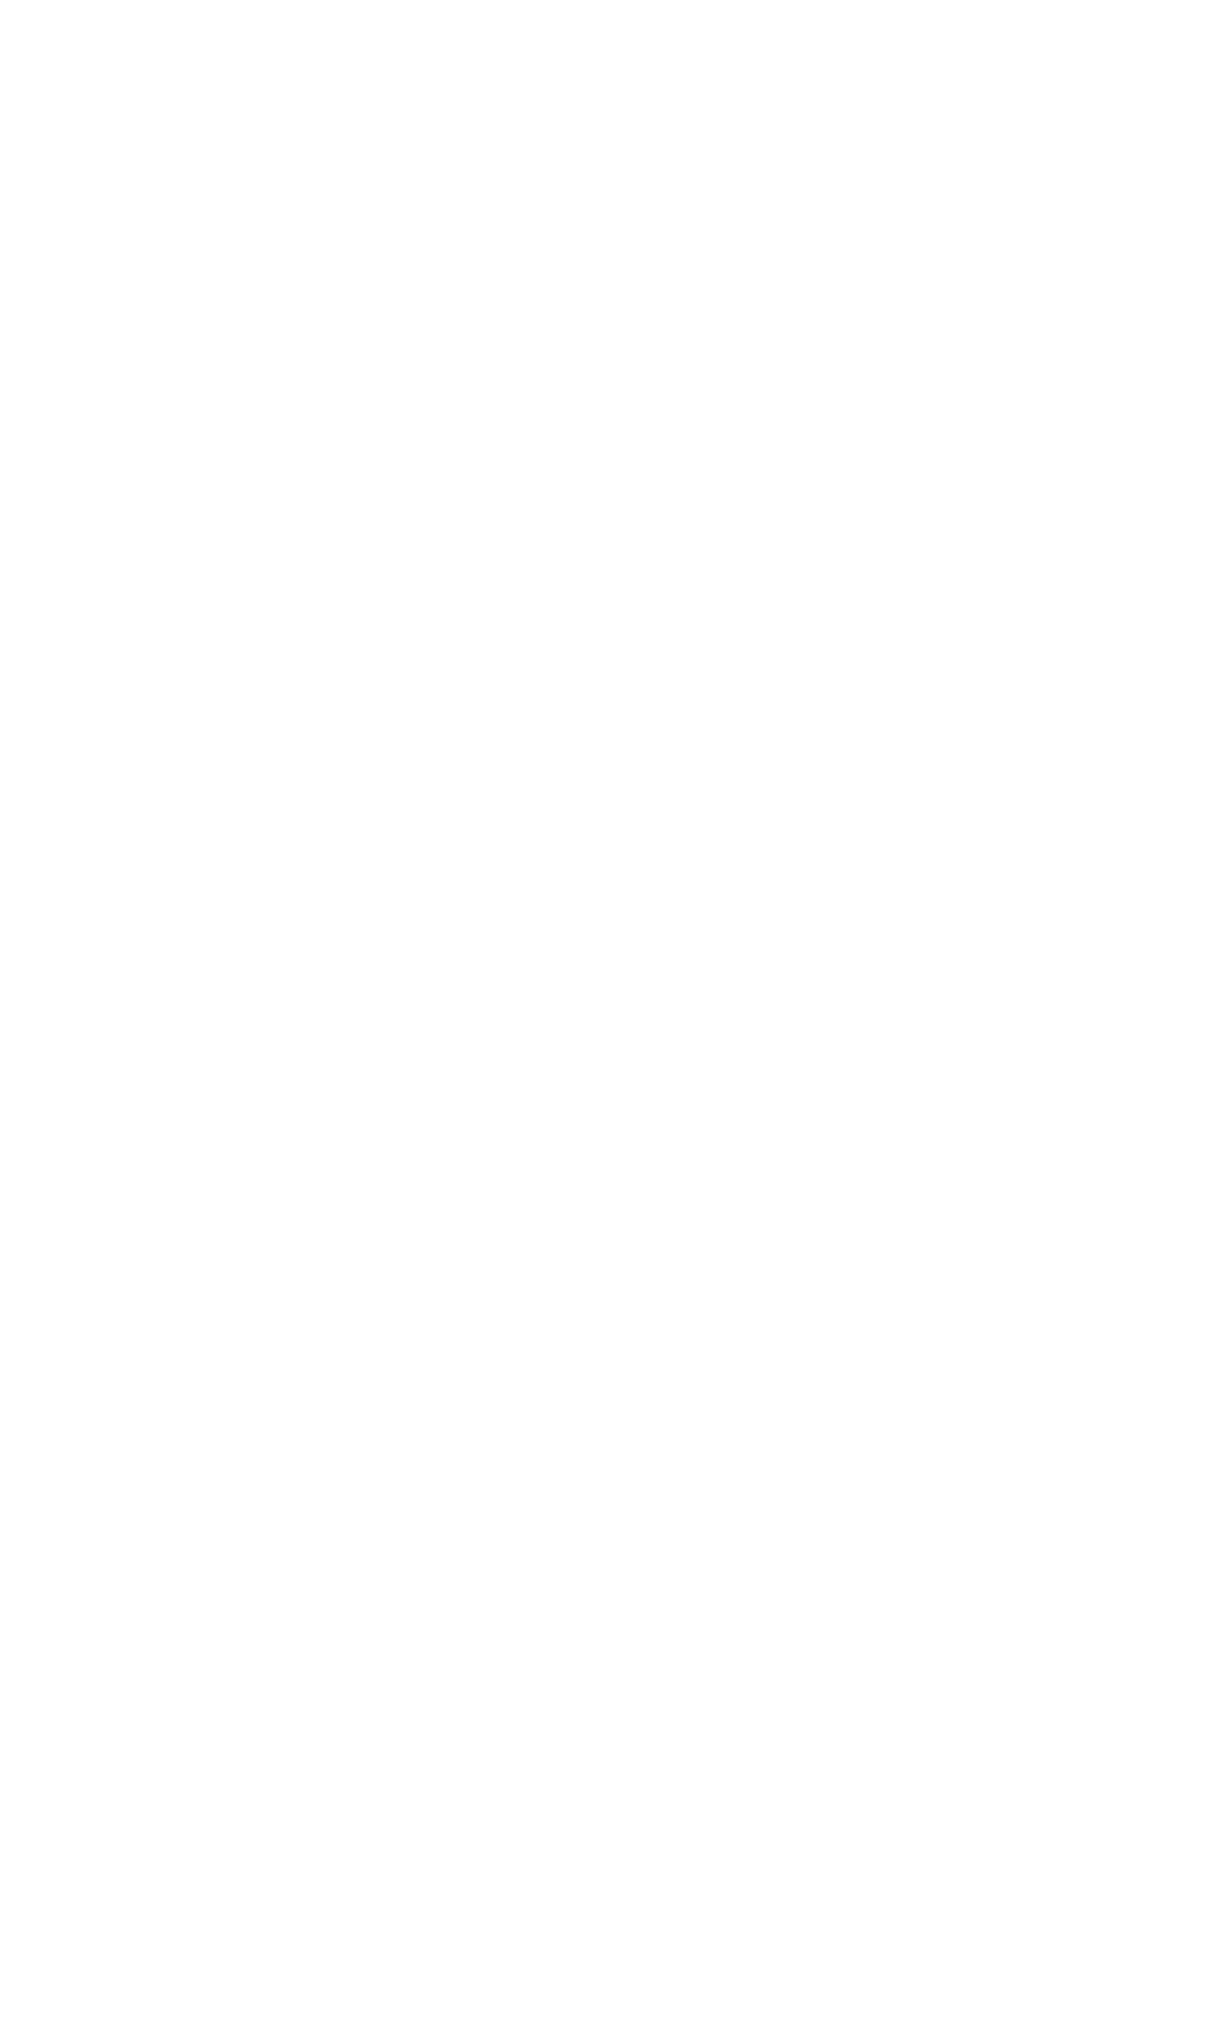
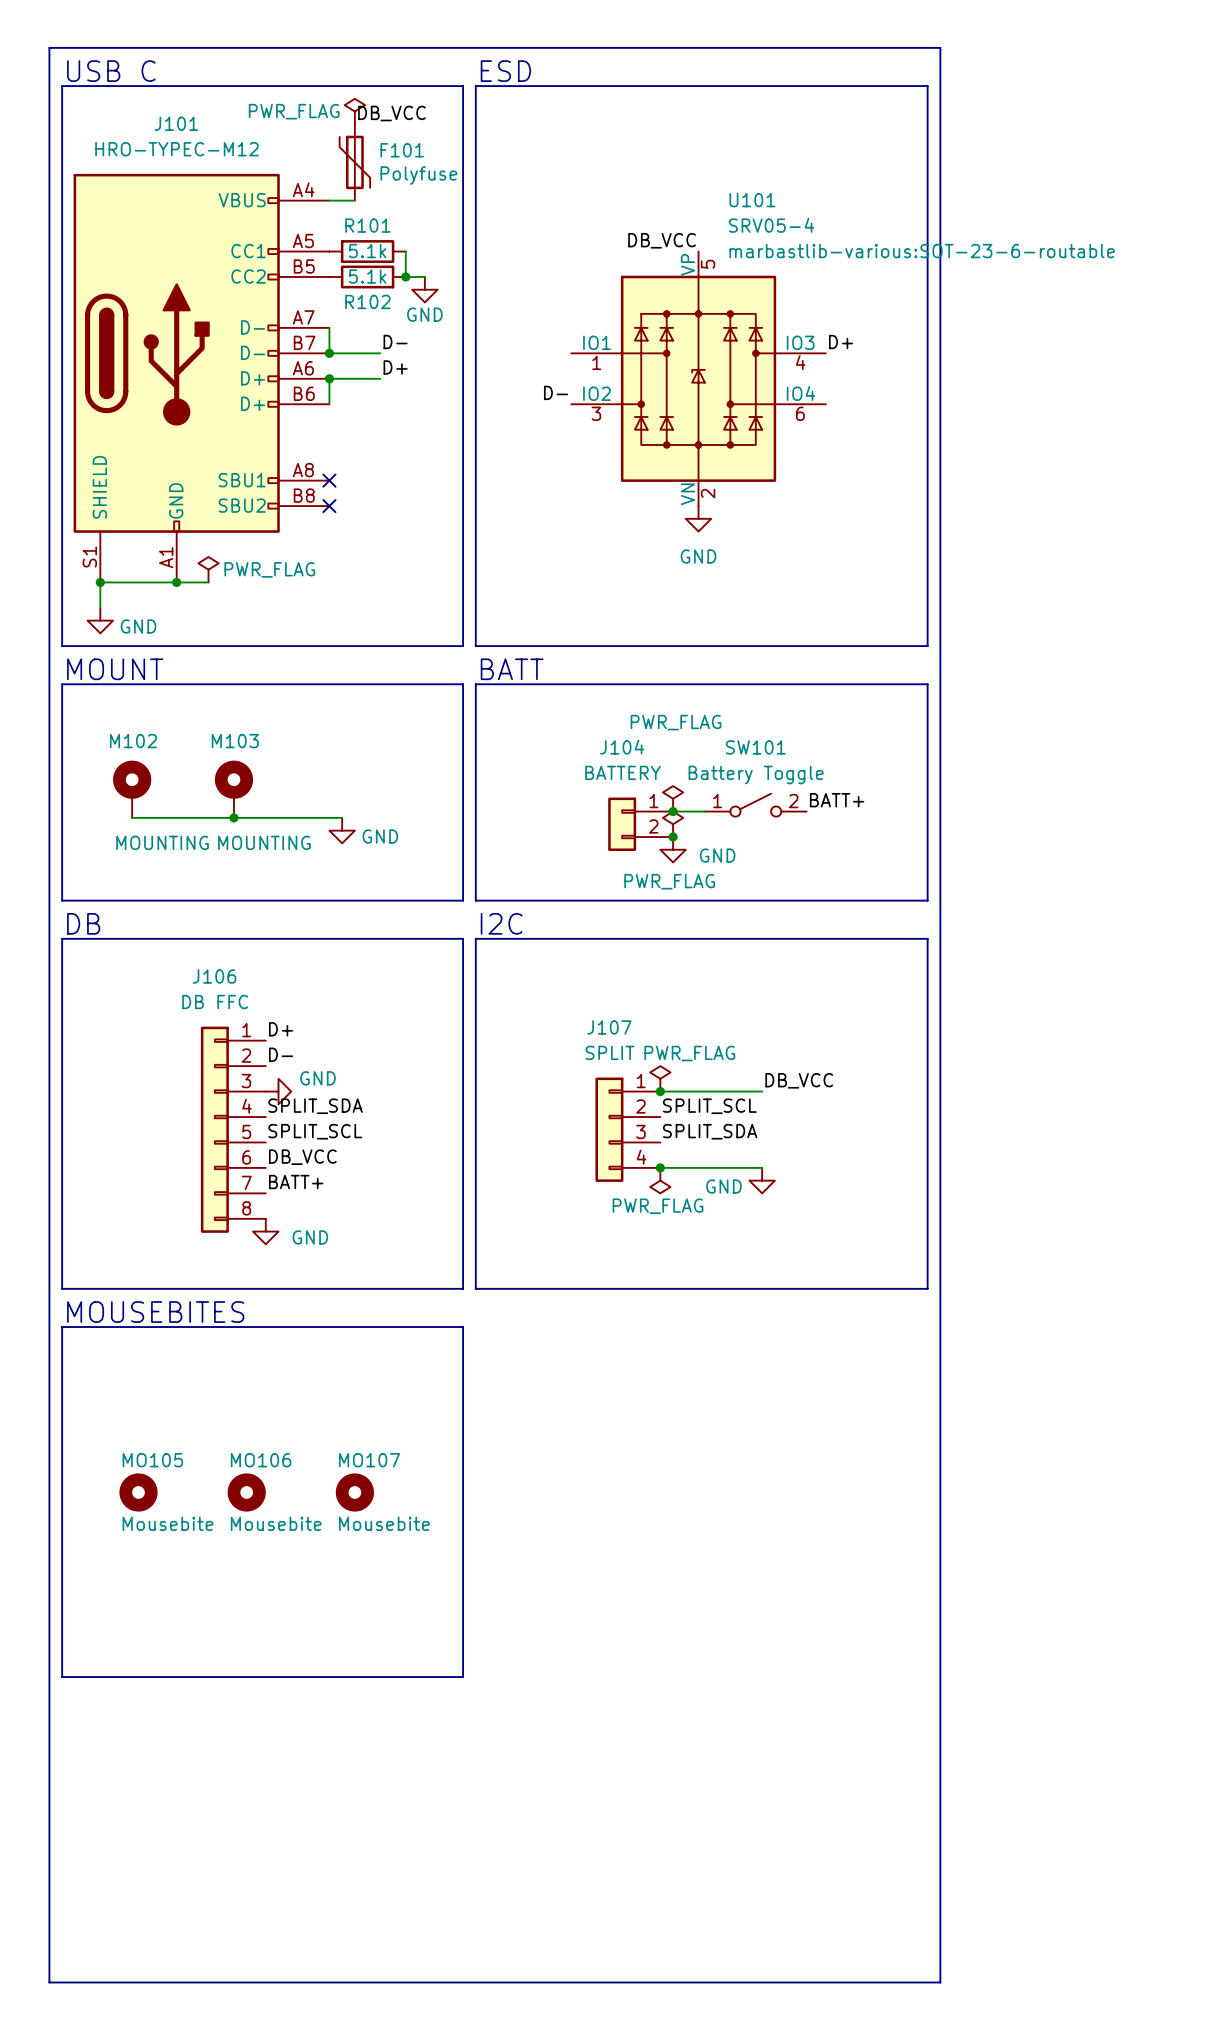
line: none -> (49, 47) (49, 1982) (940, 1982) (940, 47) (49, 47)
text: none -> USB C (111, 71)
text: none -> ESD (505, 71)
line: none -> (62, 86) (463, 86) (463, 646) (62, 646) (62, 86)
line: none -> (475, 86) (927, 86) (927, 646) (475, 646) (475, 86)
power symbol: none -> PWR_FLAG (354, 111)
label: none -> DB_VCC (391, 113)
F101: none -> Polyfuse (354, 162)
wire: none -> (329, 200) (354, 200)
label: none -> DB_VCC (662, 240)
R101: none -> 5.1k (367, 251)
wire: none -> (405, 251) (405, 276) (424, 276)
R102: none -> 5.1k (367, 276)
junction: none -> (405, 276)
power symbol: none -> GND (424, 289)
wire: none -> (329, 327) (329, 353) (380, 353)
label: none -> D- (395, 341)
label: none -> D+ (841, 341)
junction: none -> (329, 353)
label: none -> D+ (395, 367)
J101: none -> HRO-TYPEC-M12 (201, 378)
junction: none -> (329, 378)
wire: none -> (380, 378) (329, 378) (329, 404)
U101: none -> SRV05-4 (698, 378)
label: none -> D- (556, 392)
no-connect mark: none -> (329, 480)
no-connect mark: none -> (329, 506)
power symbol: none -> GND (698, 518)
power symbol: none -> PWR_FLAG (208, 569)
junction: none -> (100, 582)
junction: none -> (176, 582)
wire: none -> (208, 582) (100, 582) (100, 607)
power symbol: none -> GND (100, 620)
text: none -> MOUNT (115, 669)
text: none -> BATT (512, 669)
line: none -> (62, 684) (62, 900) (463, 900) (463, 684) (62, 684)
line: none -> (475, 684) (927, 684) (927, 900) (475, 900) (475, 684)
M102: none -> MOUNTING (132, 789)
M103: none -> MOUNTING (233, 789)
power symbol: none -> PWR_FLAG (673, 798)
label: none -> BATT+ (837, 800)
SW101: none -> Battery Toggle (755, 805)
wire: none -> (673, 811) (704, 811)
junction: none -> (673, 811)
wire: none -> (132, 817) (342, 817)
junction: none -> (233, 817)
J104: none -> BATTERY (640, 824)
power symbol: none -> PWR_FLAG (673, 824)
power symbol: none -> GND (342, 830)
junction: none -> (673, 837)
power symbol: none -> GND (673, 849)
text: none -> DB (83, 923)
text: none -> I2C (501, 923)
line: none -> (62, 938) (62, 1288) (463, 1288) (463, 938) (62, 938)
line: none -> (475, 938) (475, 1288) (927, 1288) (927, 938) (475, 938)
label: none -> D+ (281, 1029)
label: none -> D- (281, 1054)
power symbol: none -> PWR_FLAG (660, 1078)
label: none -> DB_VCC (799, 1080)
power symbol: none -> GND (278, 1091)
wire: none -> (660, 1091) (762, 1091)
junction: none -> (660, 1091)
label: none -> SPLIT_SDA (315, 1106)
label: none -> SPLIT_SCL (709, 1106)
J106: none -> DB FFC (233, 1129)
J107: none -> SPLIT (627, 1129)
label: none -> SPLIT_SCL (315, 1131)
label: none -> SPLIT_SDA (710, 1131)
label: none -> DB_VCC (302, 1157)
wire: none -> (660, 1167) (762, 1167)
junction: none -> (660, 1167)
power symbol: none -> PWR_FLAG (660, 1180)
power symbol: none -> GND (762, 1180)
label: none -> BATT+ (296, 1182)
power symbol: none -> GND (265, 1231)
text: none -> MOUSEBITES (155, 1312)
line: none -> (62, 1327) (463, 1327) (463, 1677) (62, 1677) (62, 1327)
MO105: none -> Mousebite (138, 1492)
MO106: none -> Mousebite (246, 1492)
MO107: none -> Mousebite (354, 1492)

